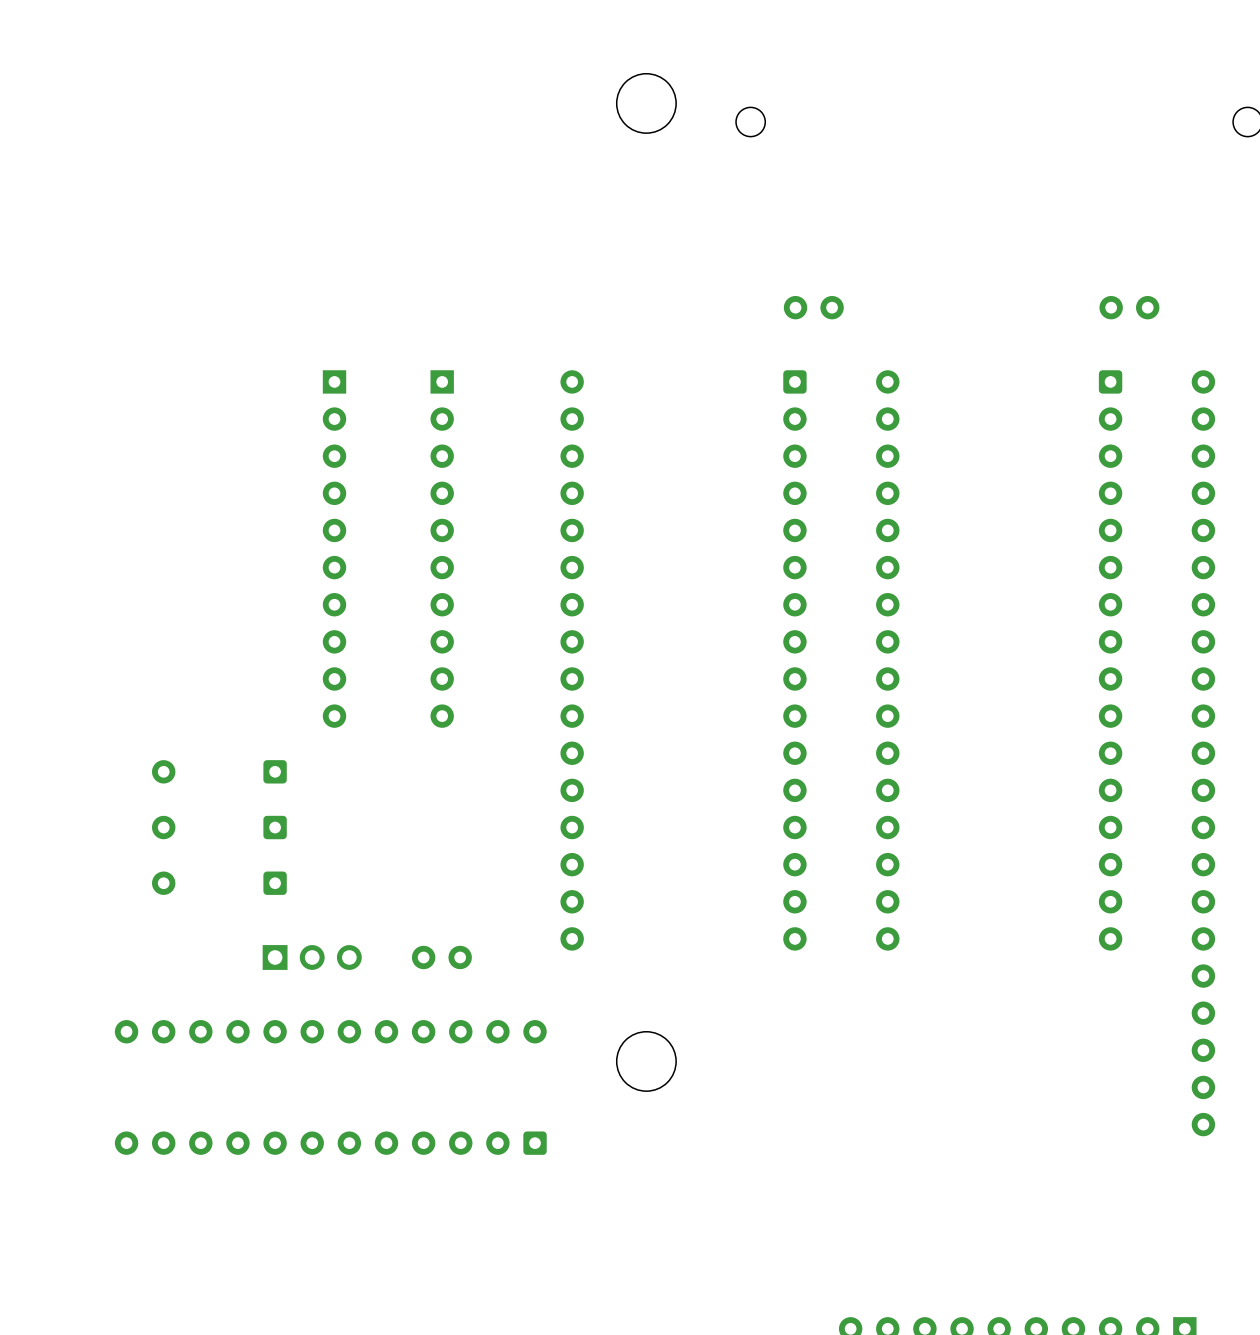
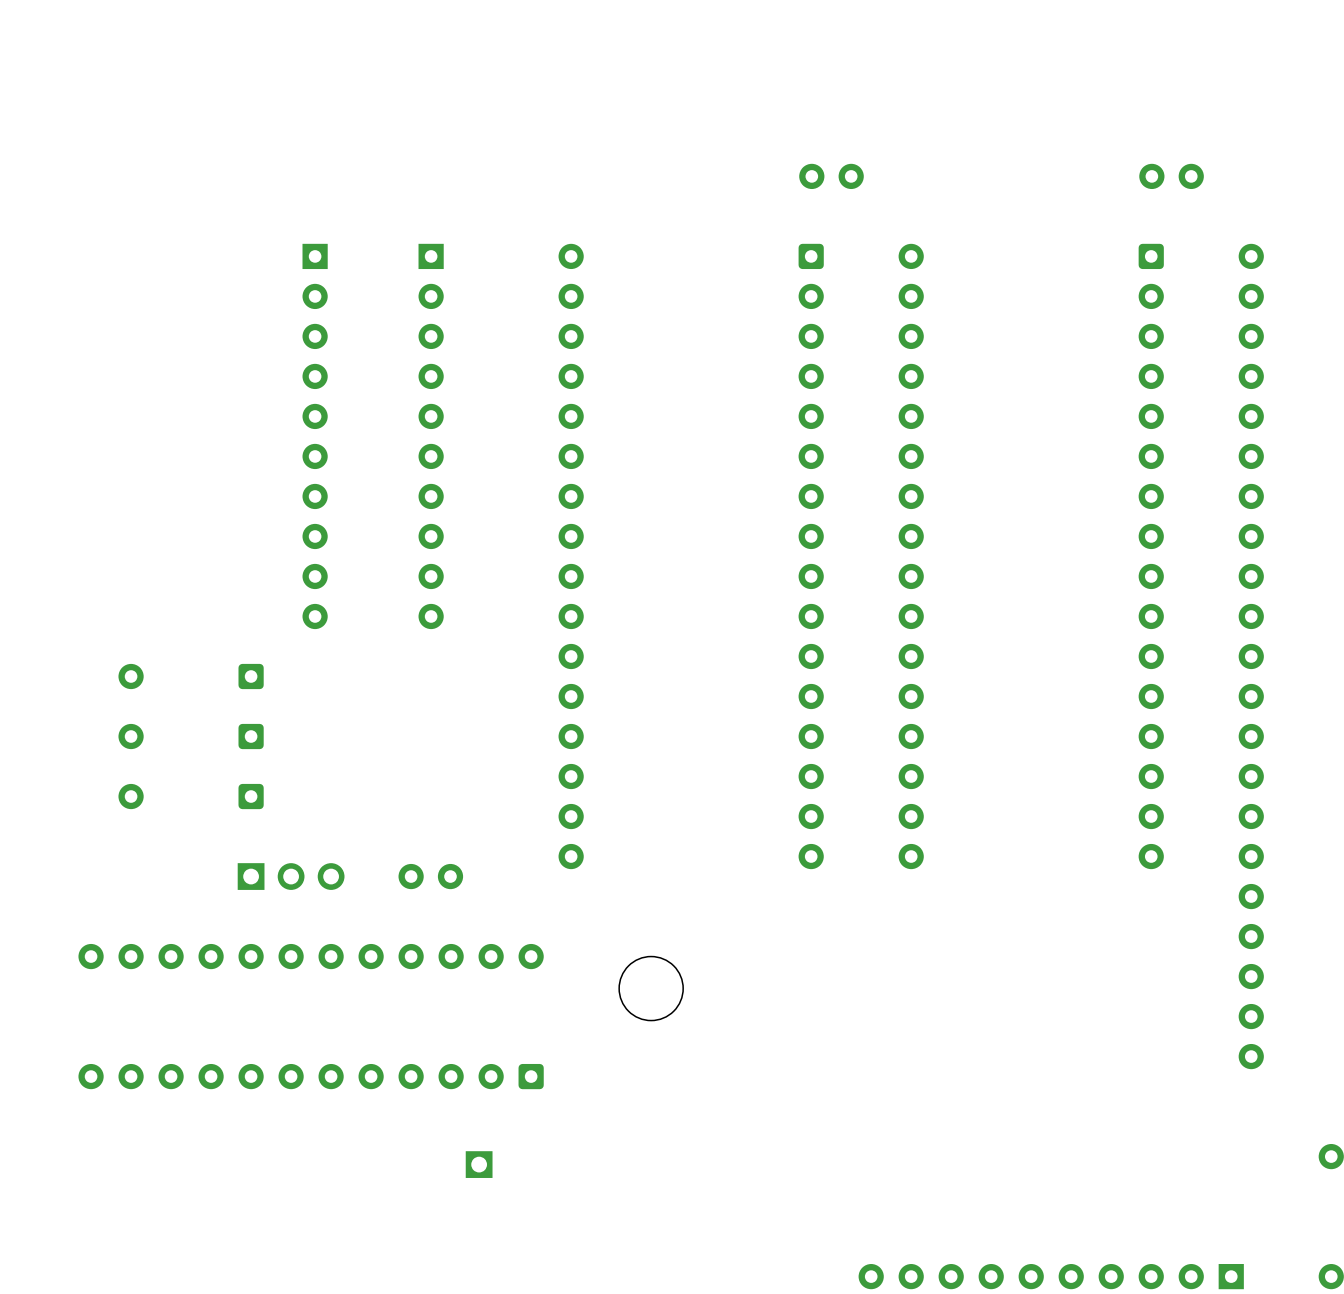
part: none -> (479, 1164)

